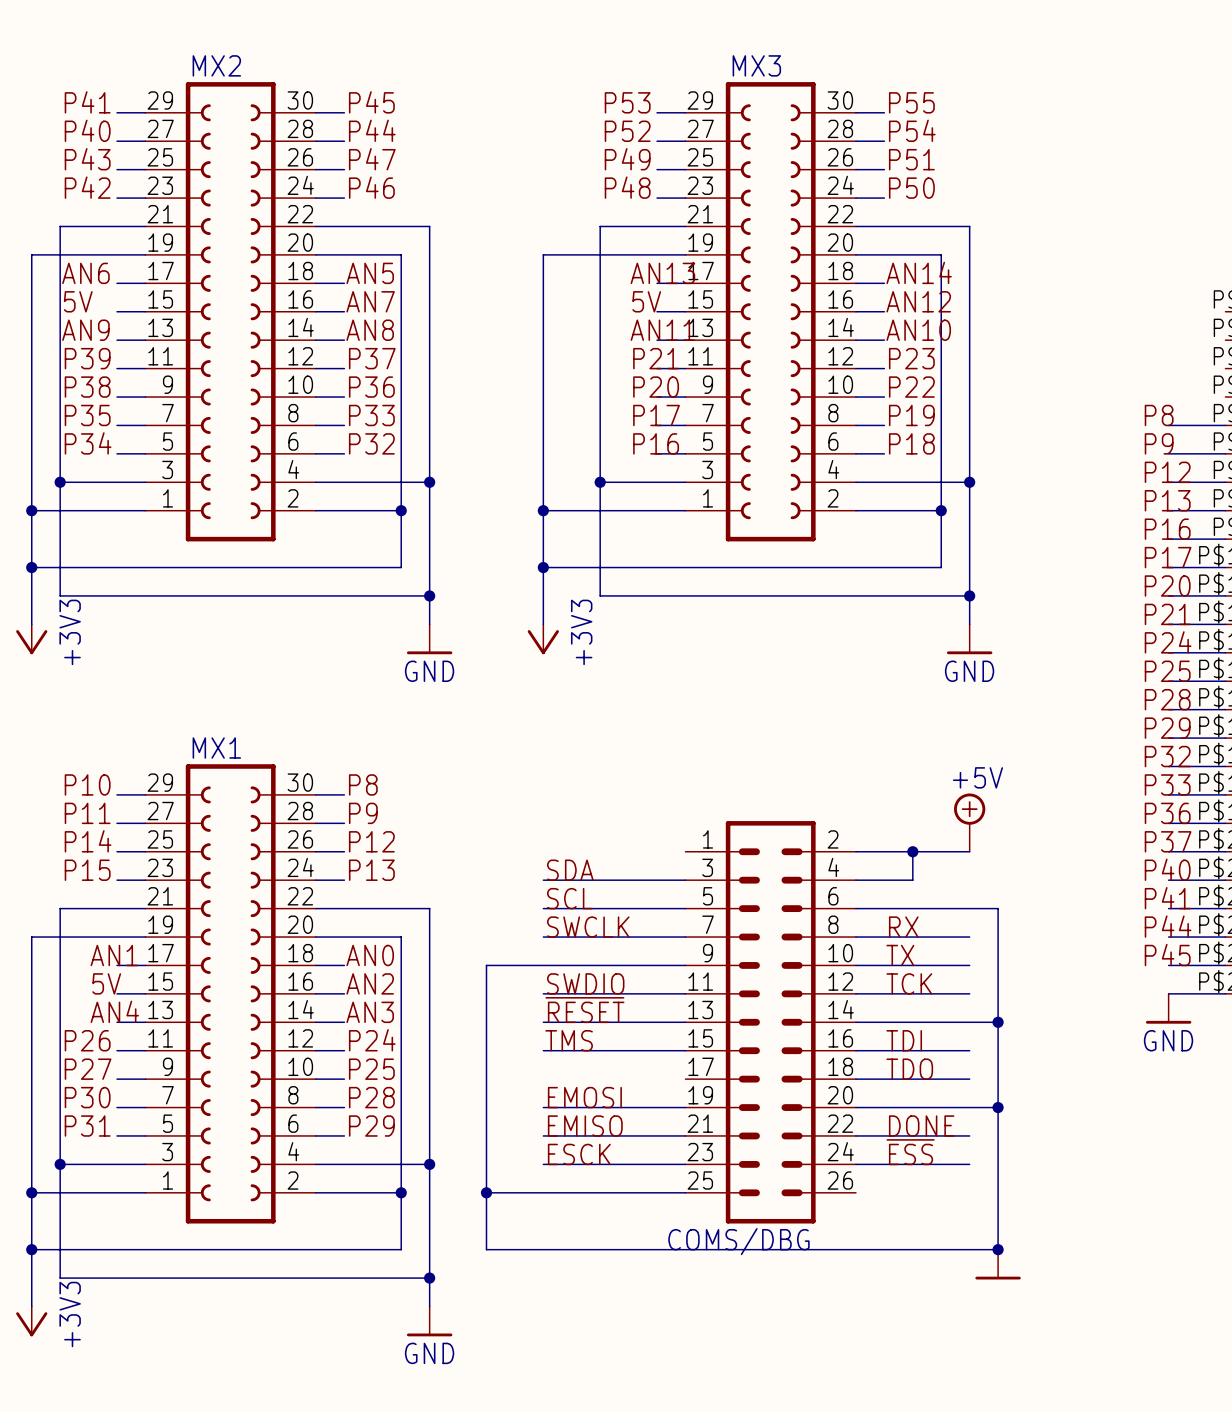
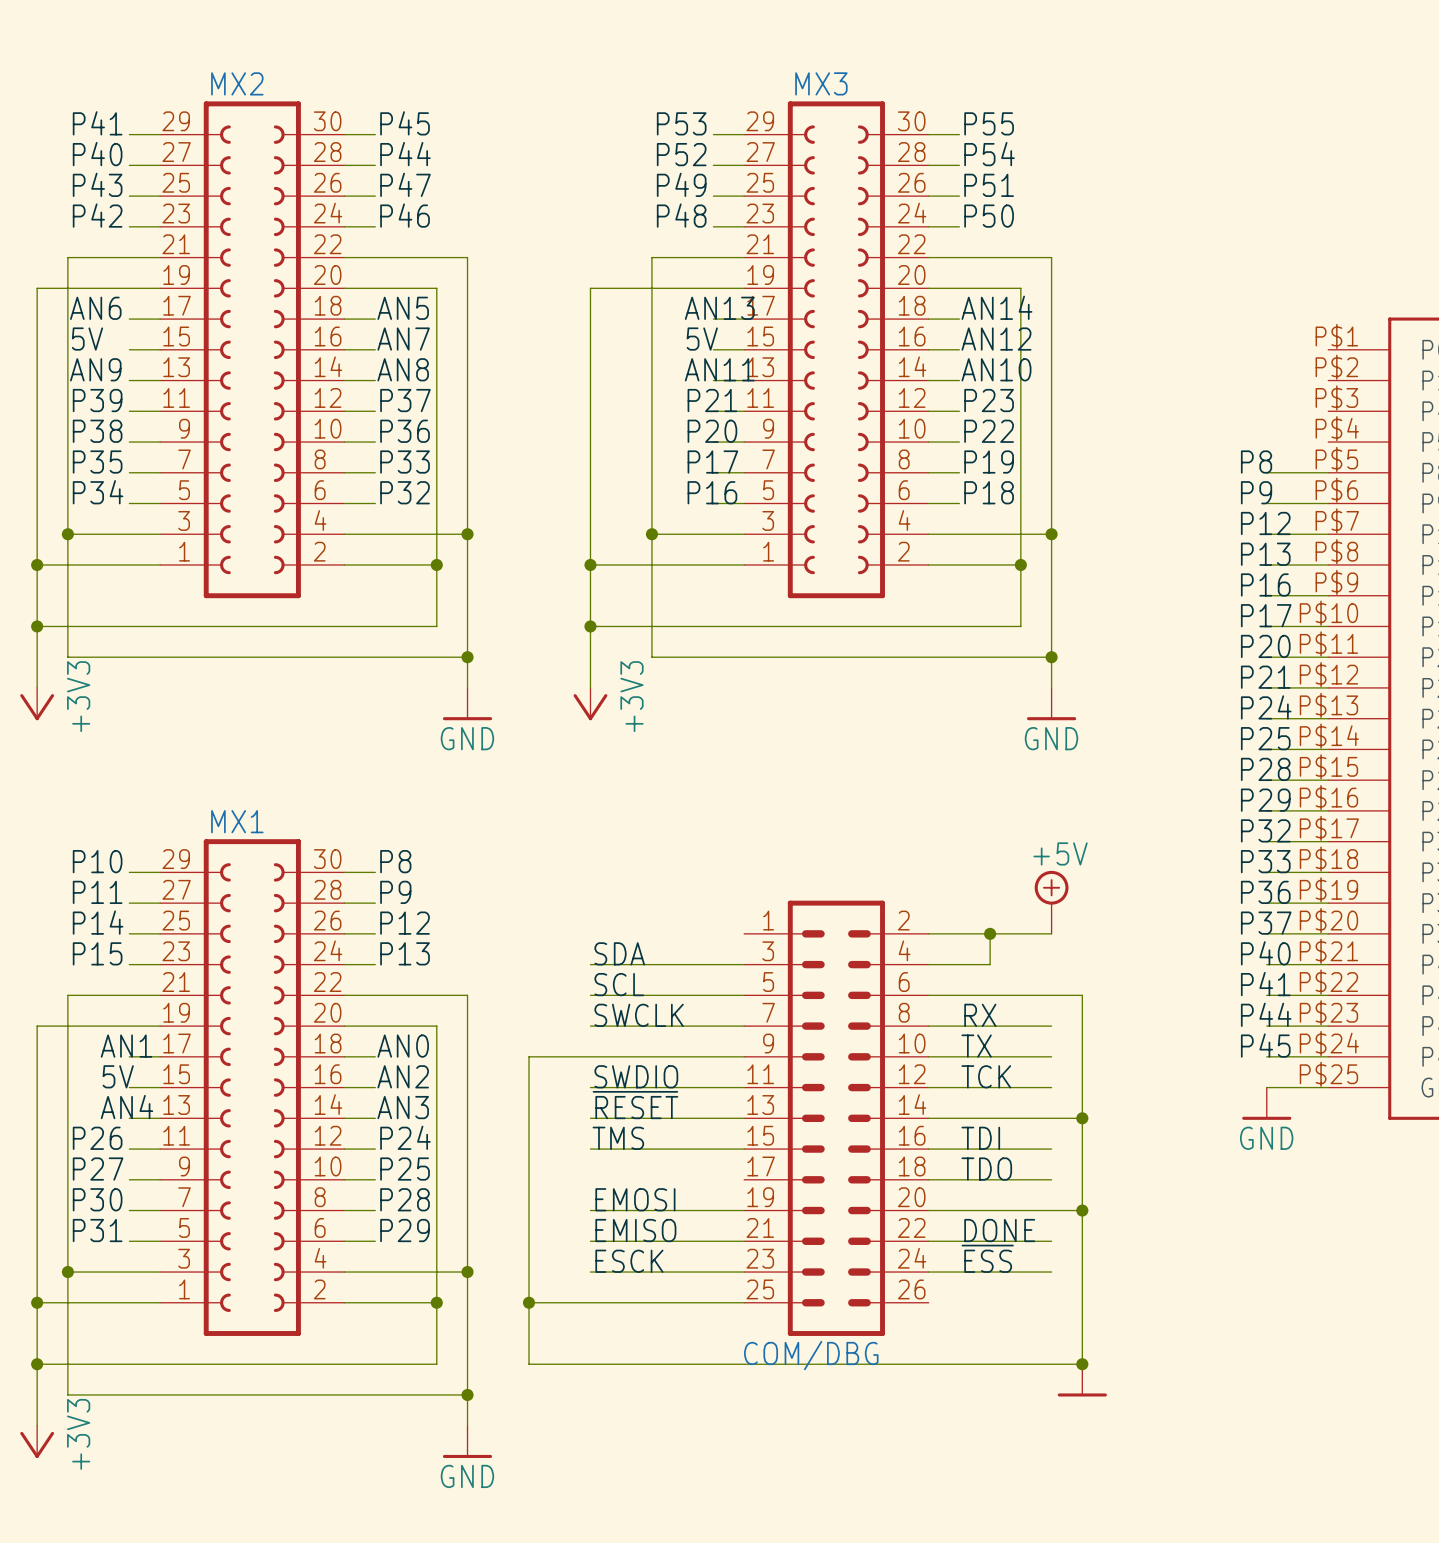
COMS/DBG name: COMS/DBG (738, 1241) -> COM/DBG (811, 1355)

